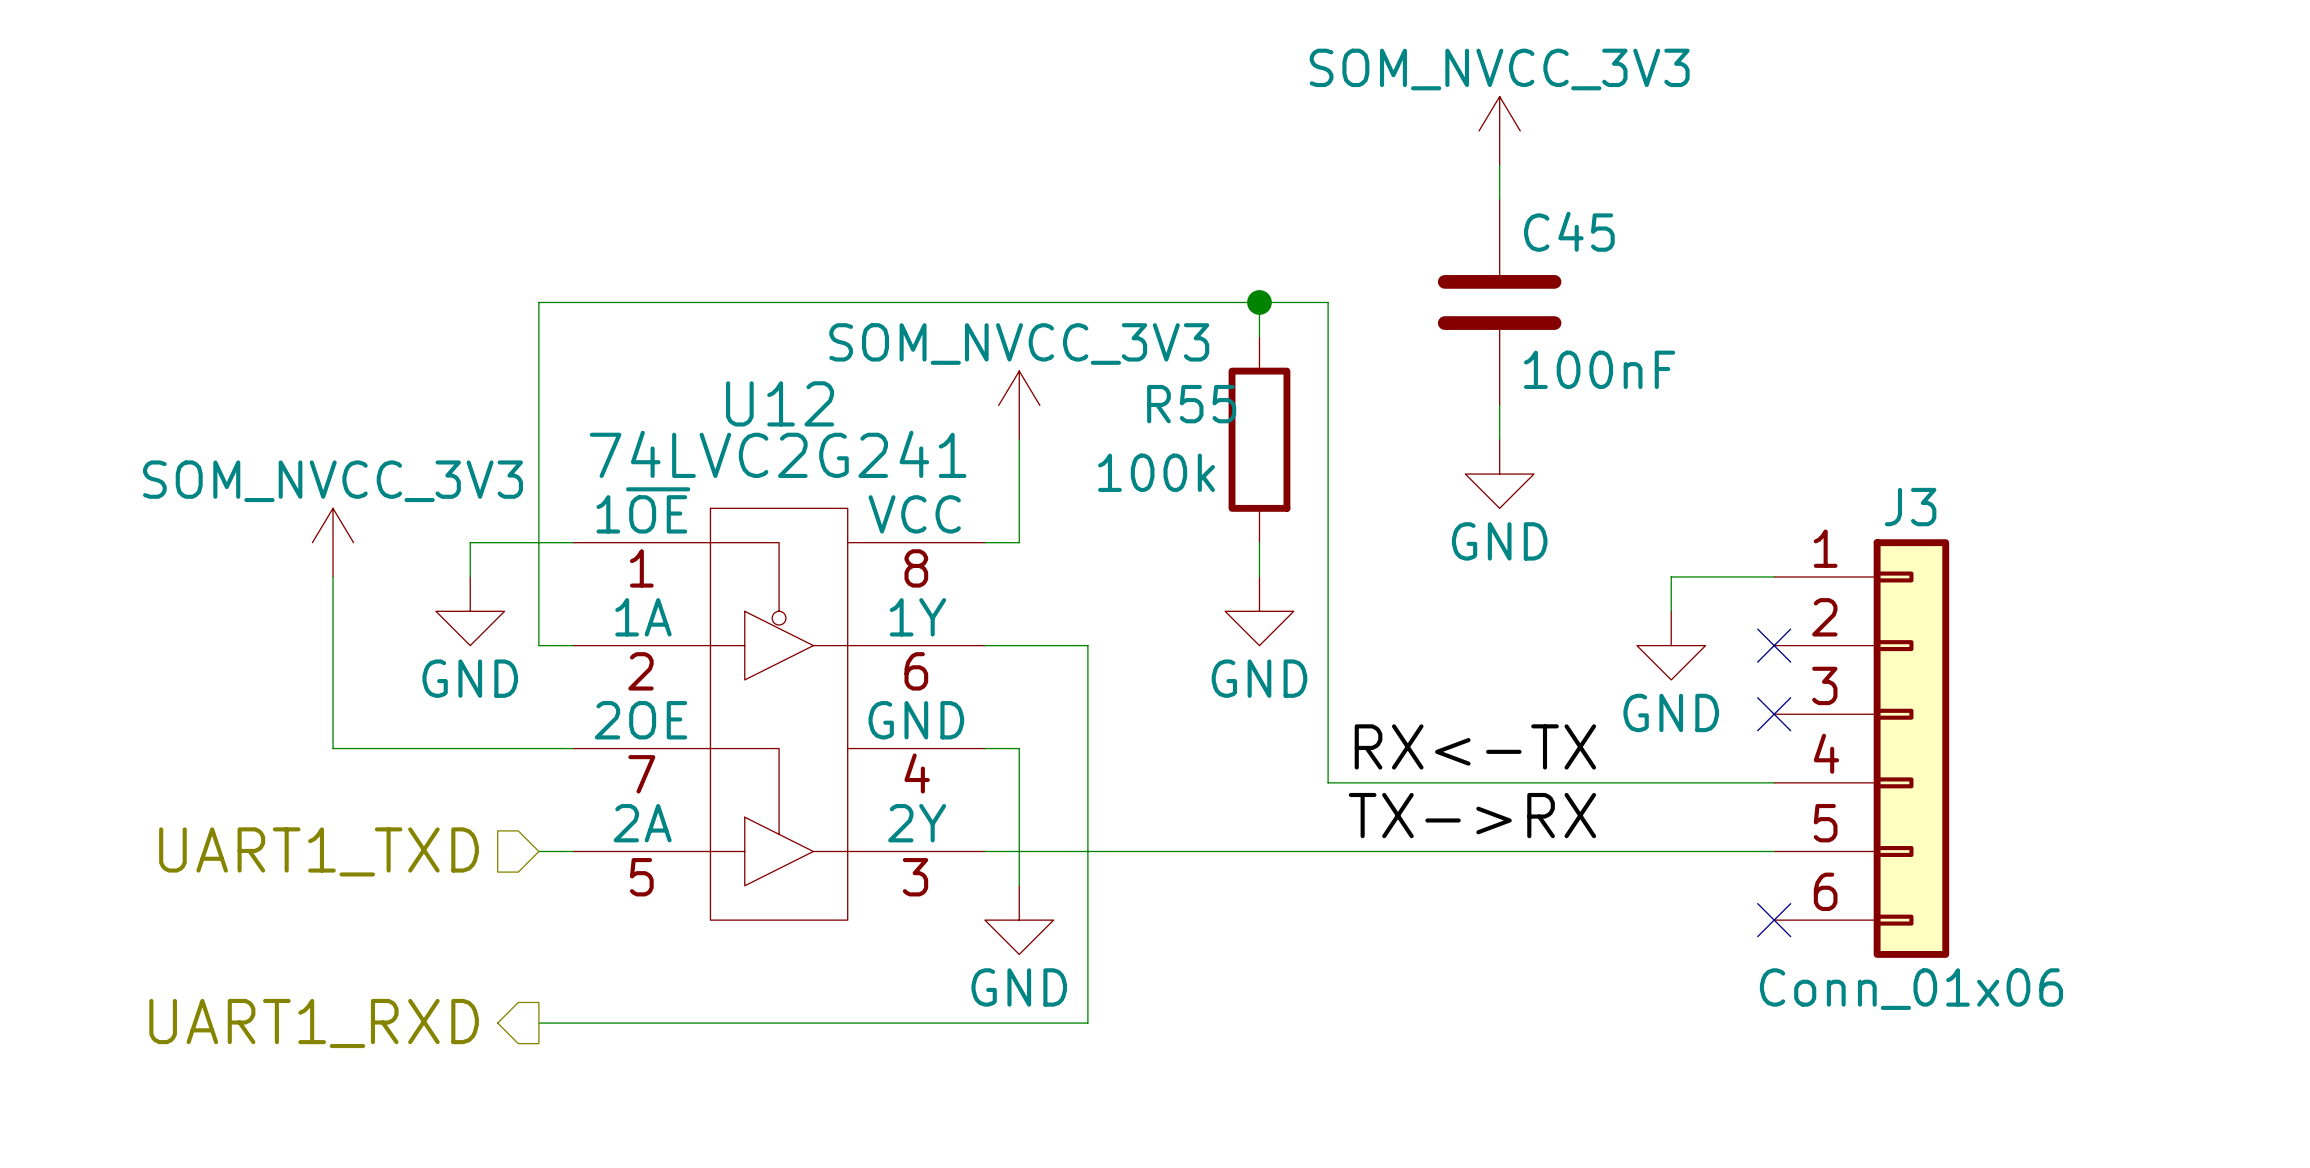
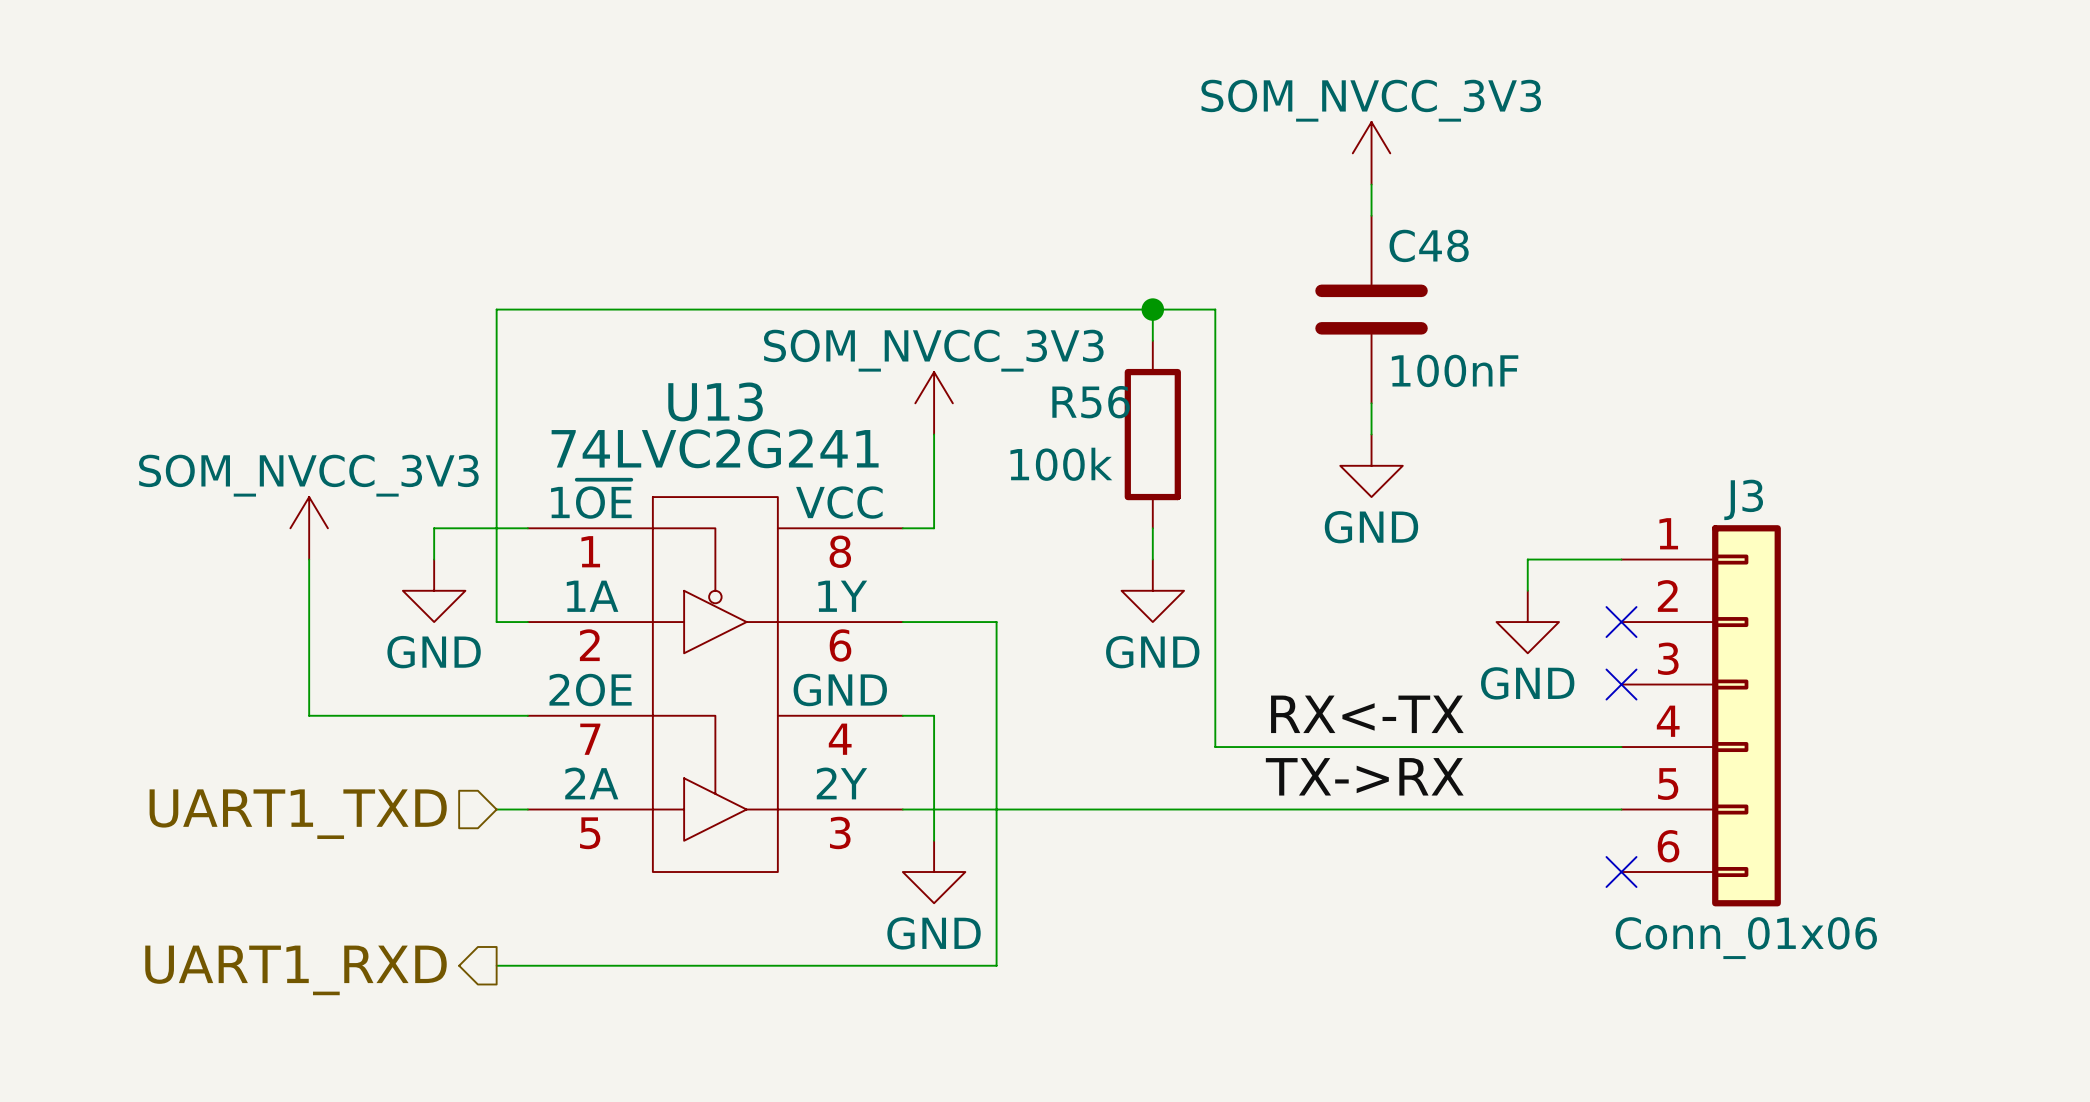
C45 name: C45 (1569, 231) -> C48 (1429, 245)
U12 name: U12 (780, 403) -> U13 (715, 401)
R55 name: R55 (1191, 404) -> R56 (1091, 402)

